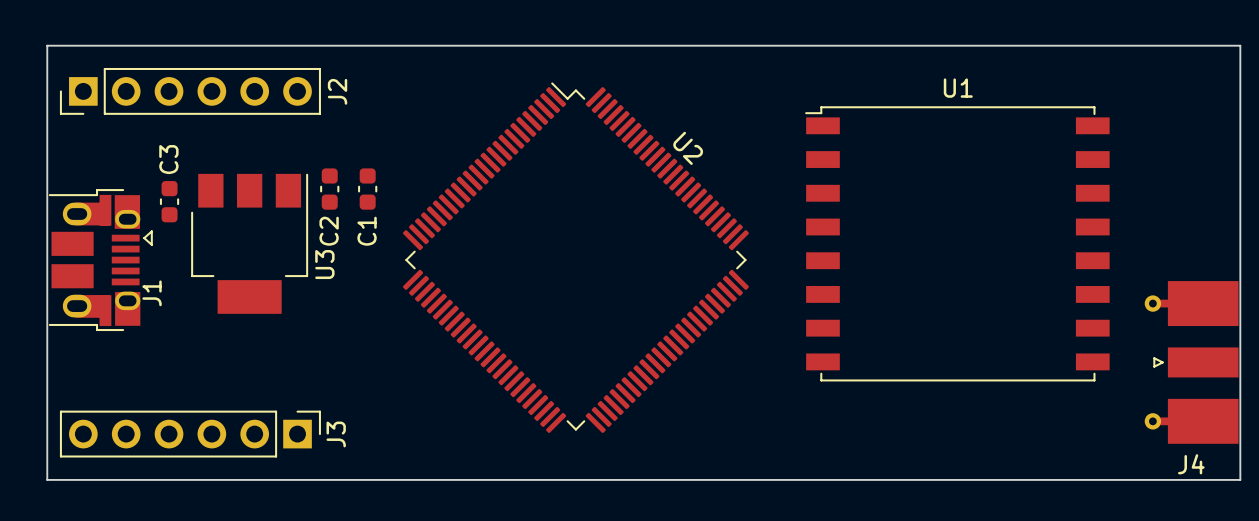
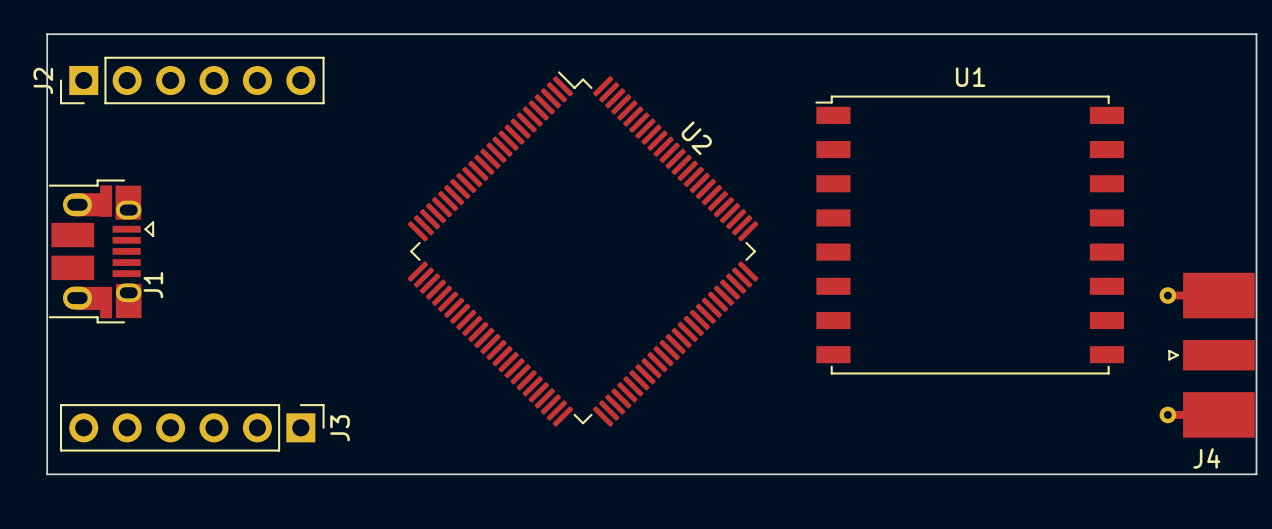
J2 name position: J2 (337, 91) -> J2 (43, 80)
C2: (329, 189) -> none
C1: (367, 189) -> none
C3: (169, 201) -> none
U3: (249, 243) -> none

